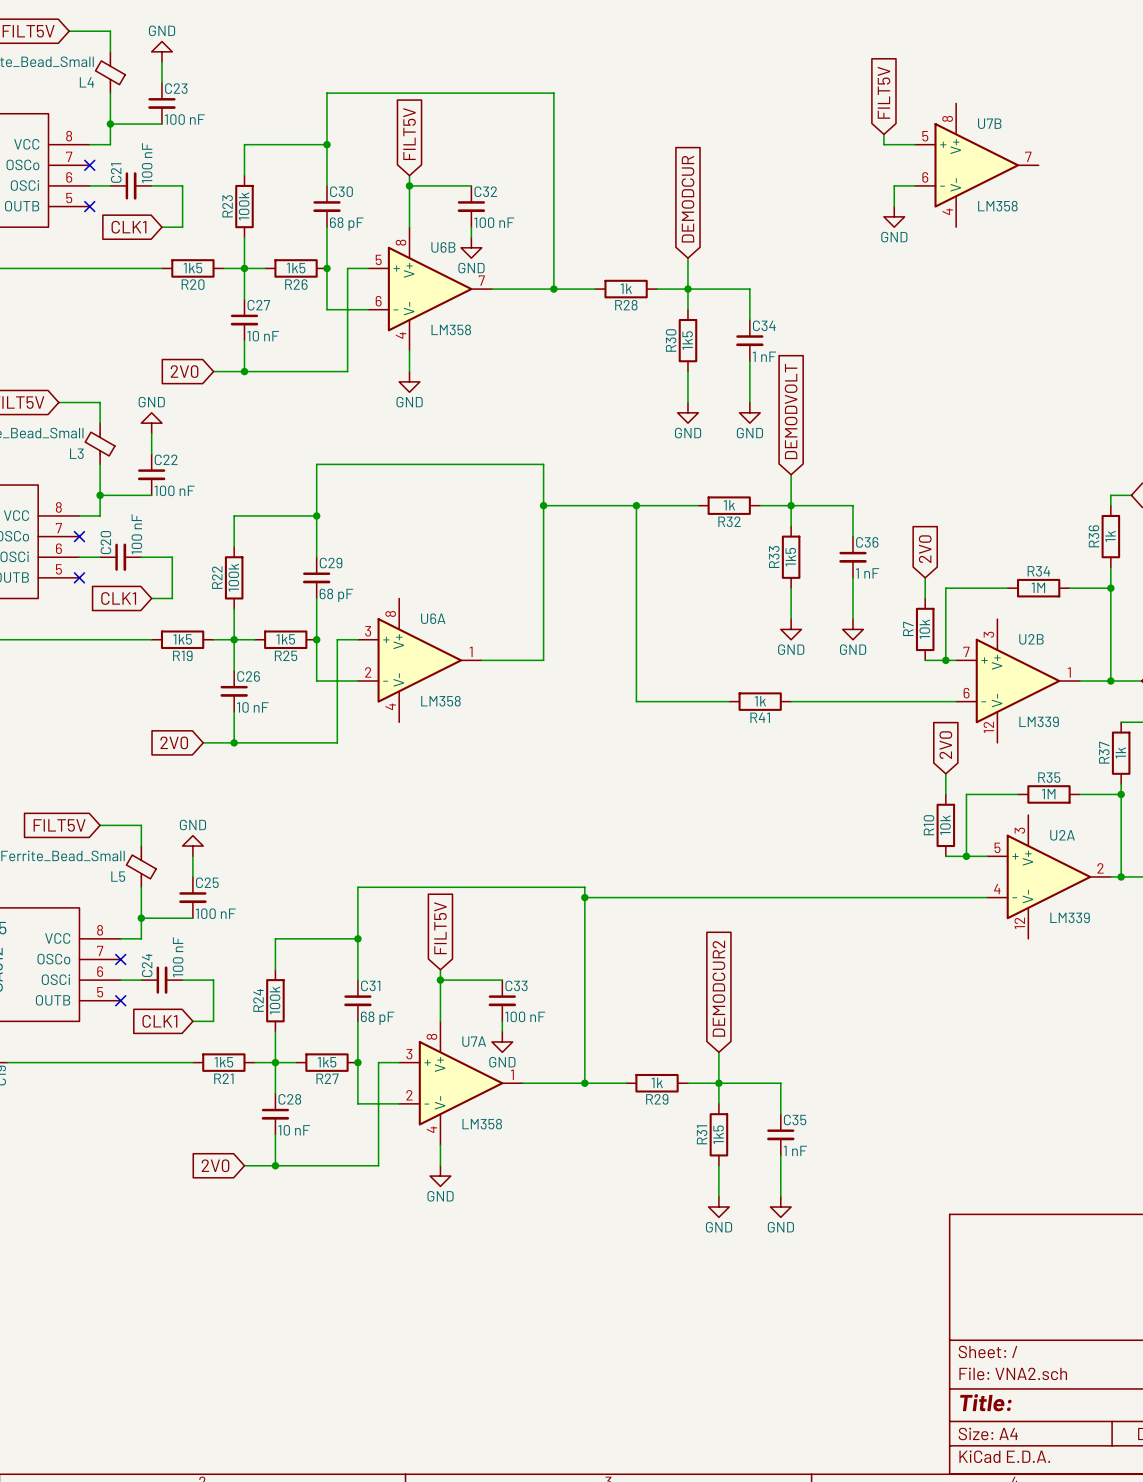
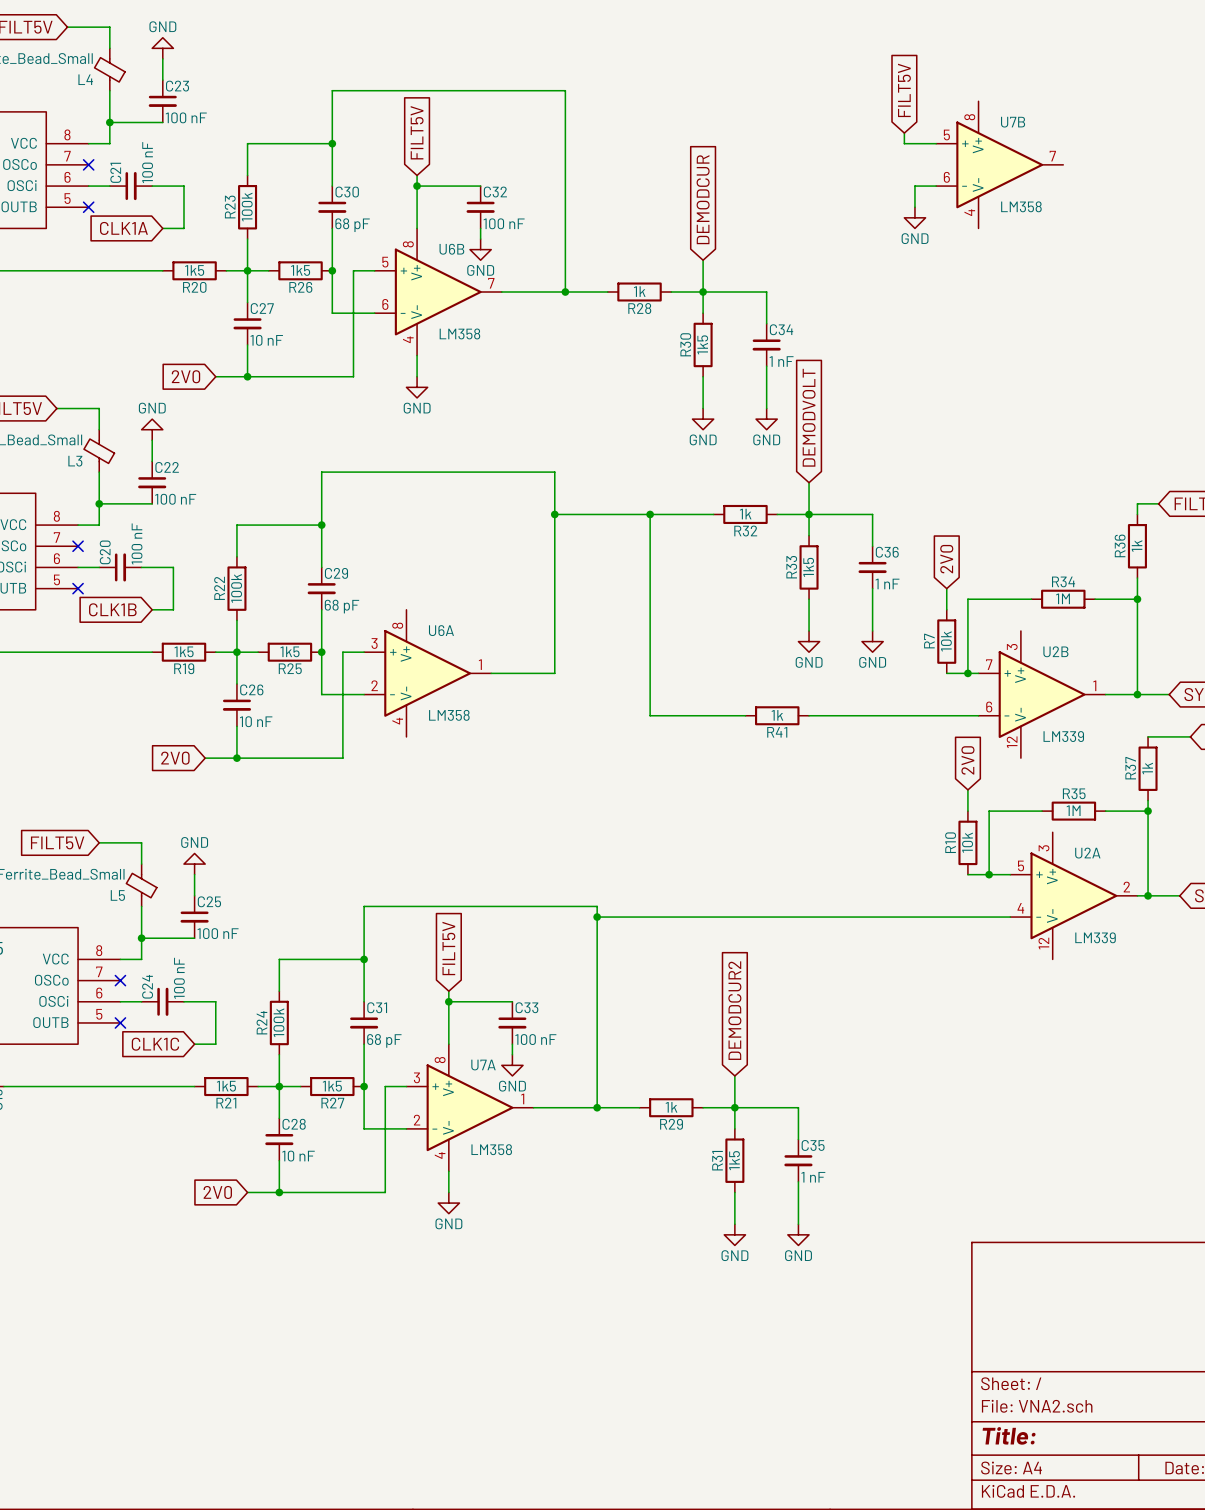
global label: CLK1 (128, 227) -> CLK1A (123, 228)
global label: CLK1 (118, 598) -> CLK1B (112, 609)
global label: CLK1 (159, 1021) -> CLK1C (155, 1044)

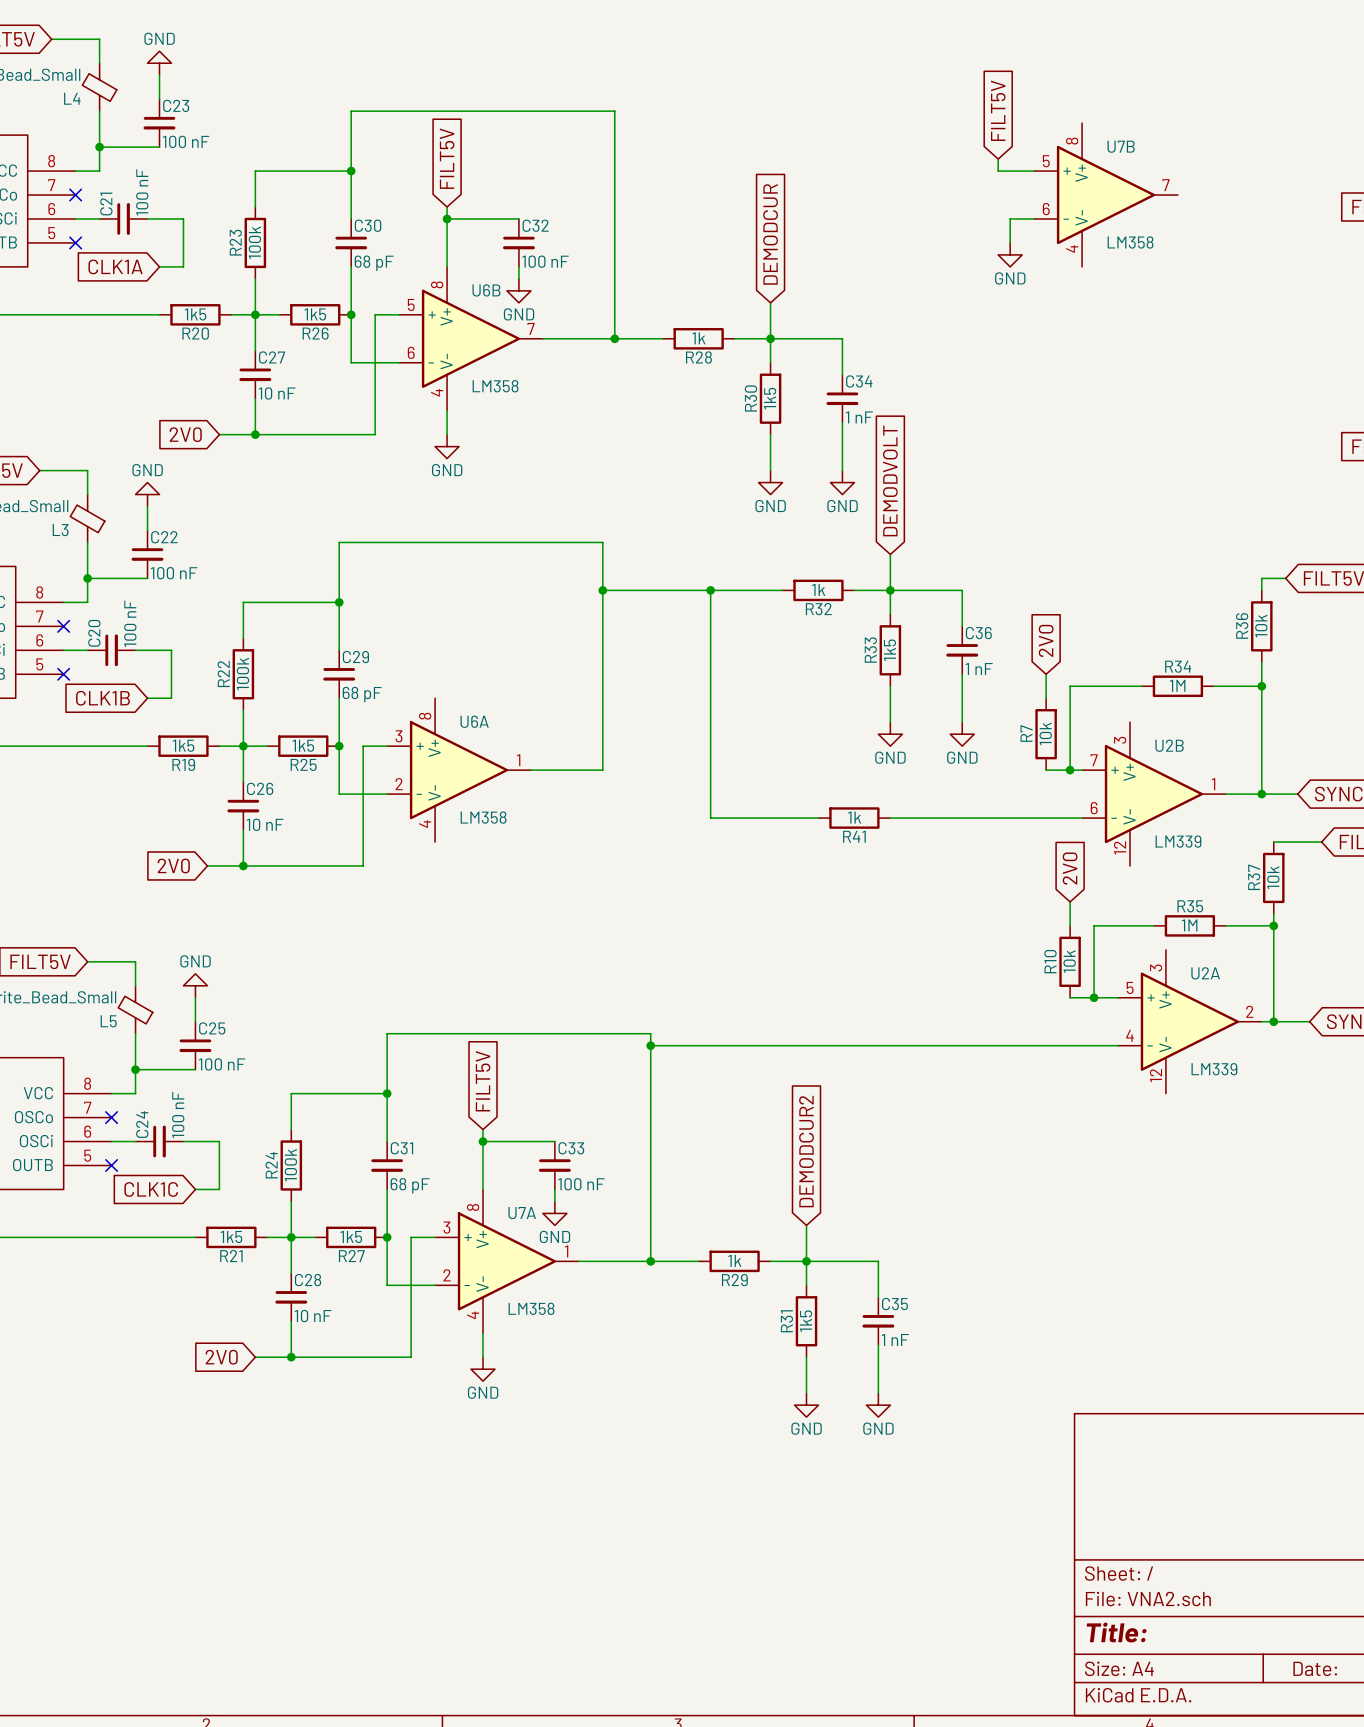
R36 value: 1k (1137, 546) -> 10k (1261, 626)
R37 value: 1k (1147, 768) -> 10k (1273, 877)

